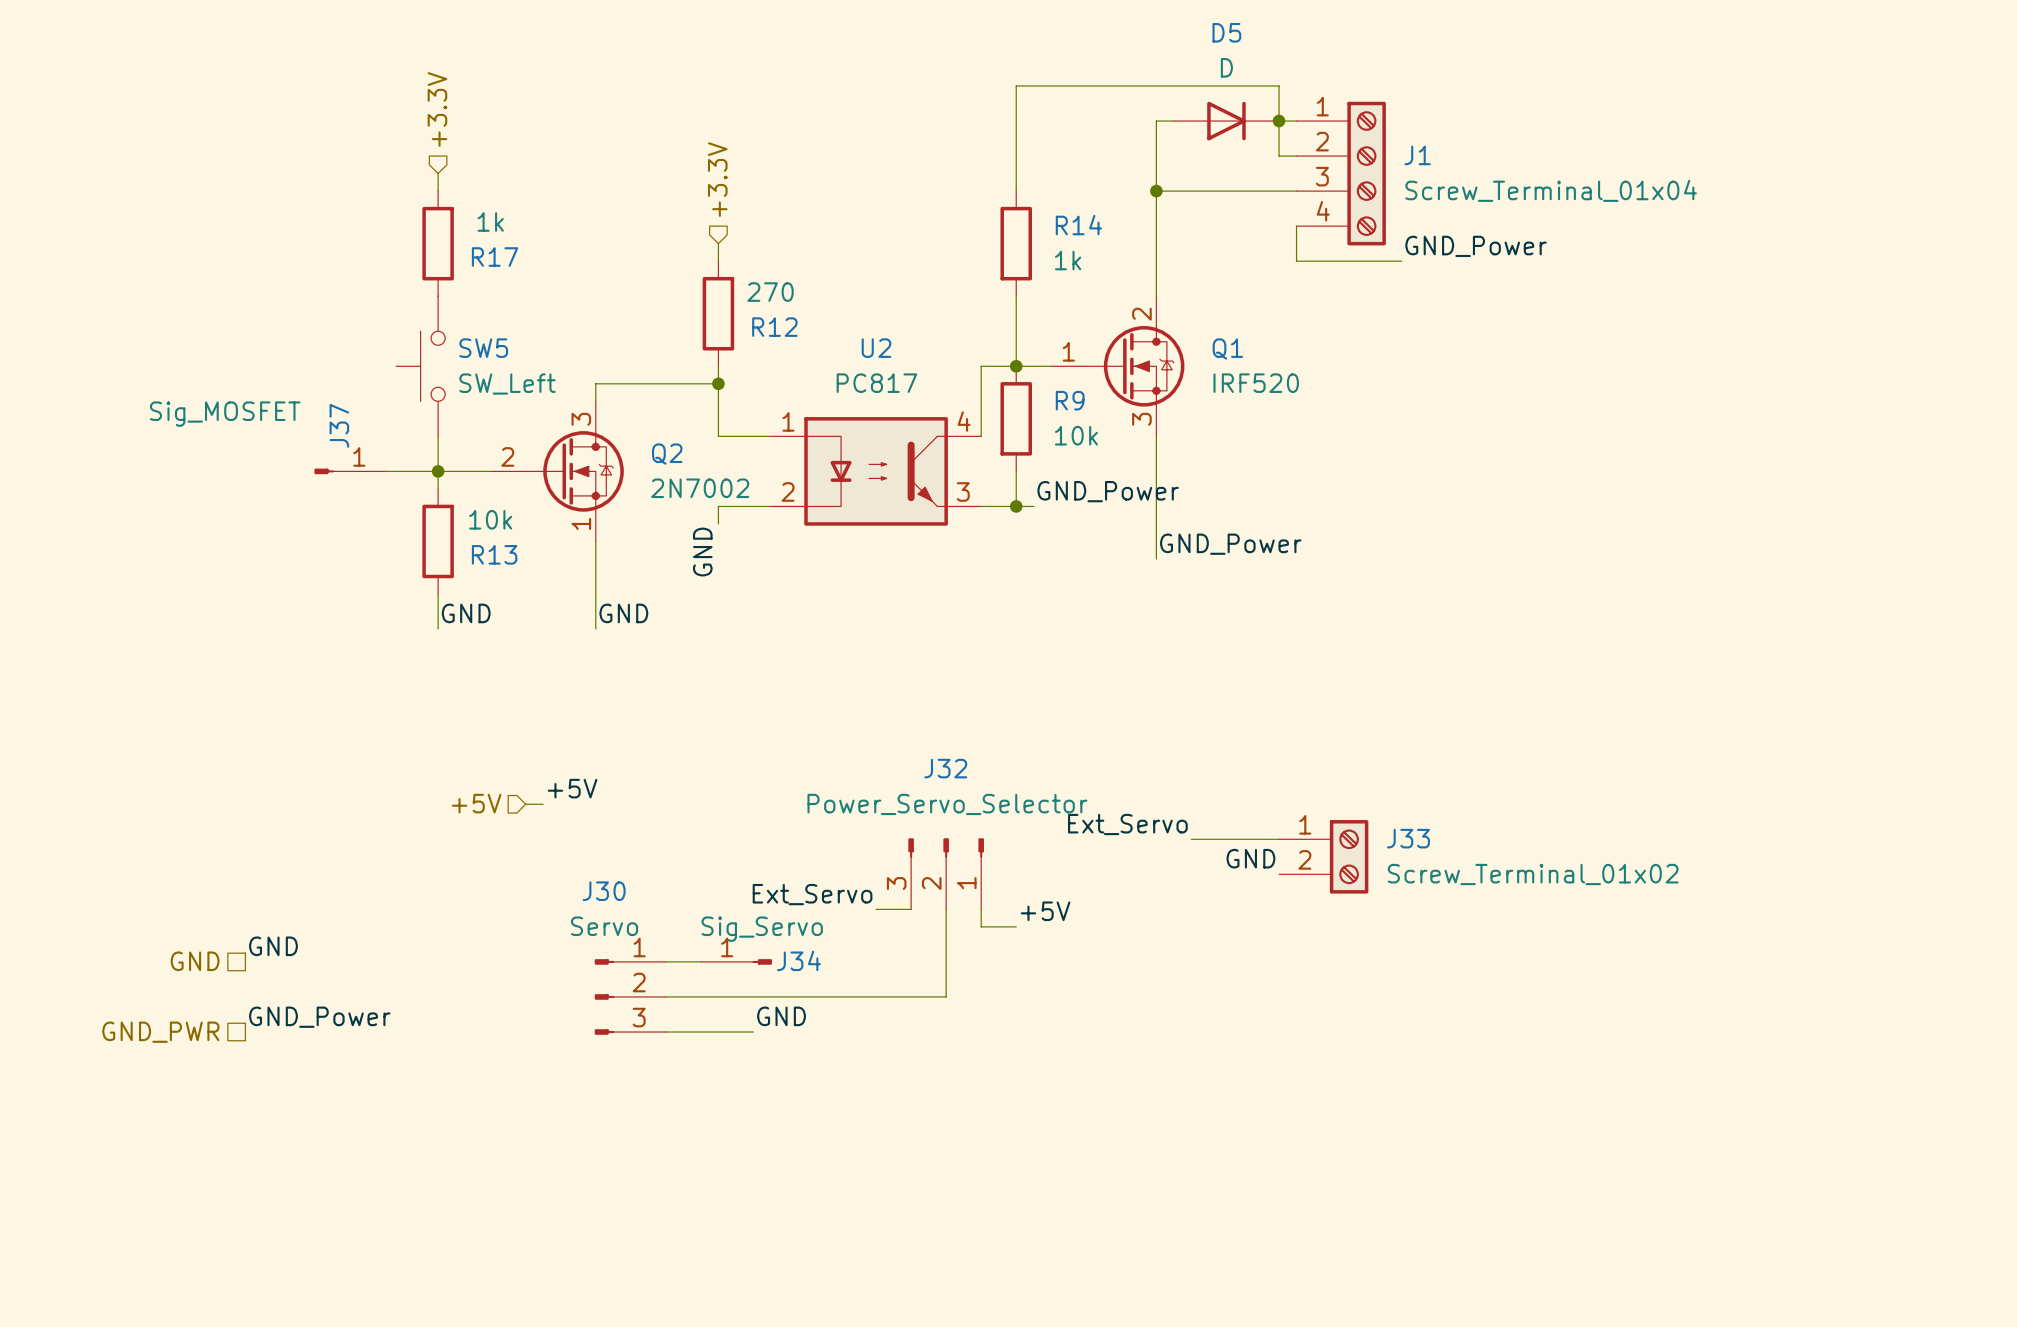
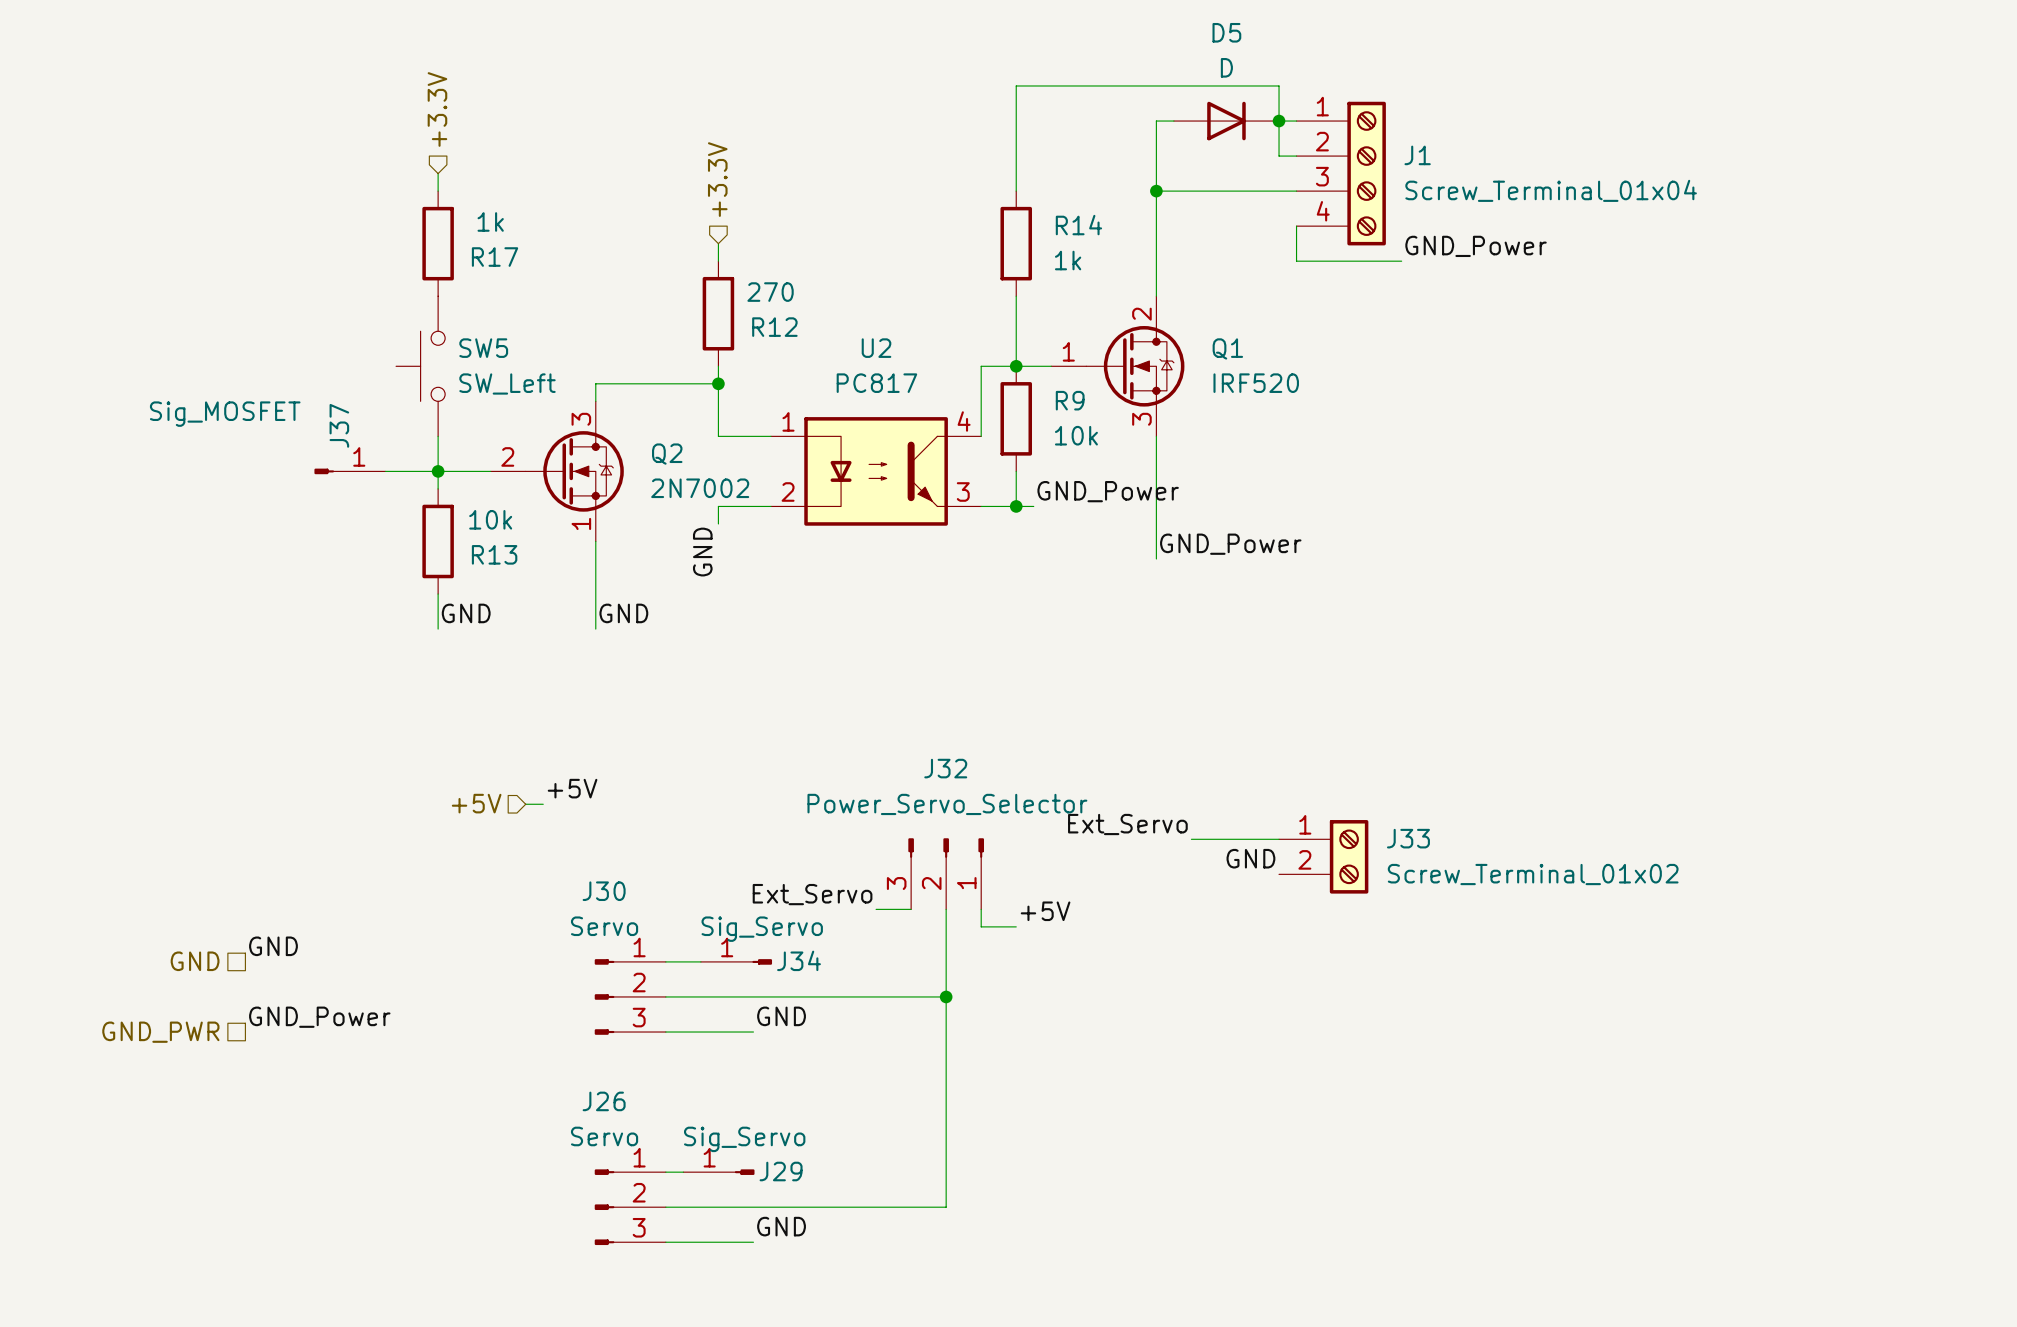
wire: none -> (946, 996) (946, 1207) (665, 1207)
junction: none -> (946, 996)
wire: none -> (665, 1172) (683, 1172)
J29: none -> Sig_Servo (718, 1172)
J26: none -> Servo (630, 1207)
label: none -> GND (781, 1226)
wire: none -> (665, 1242) (753, 1242)

